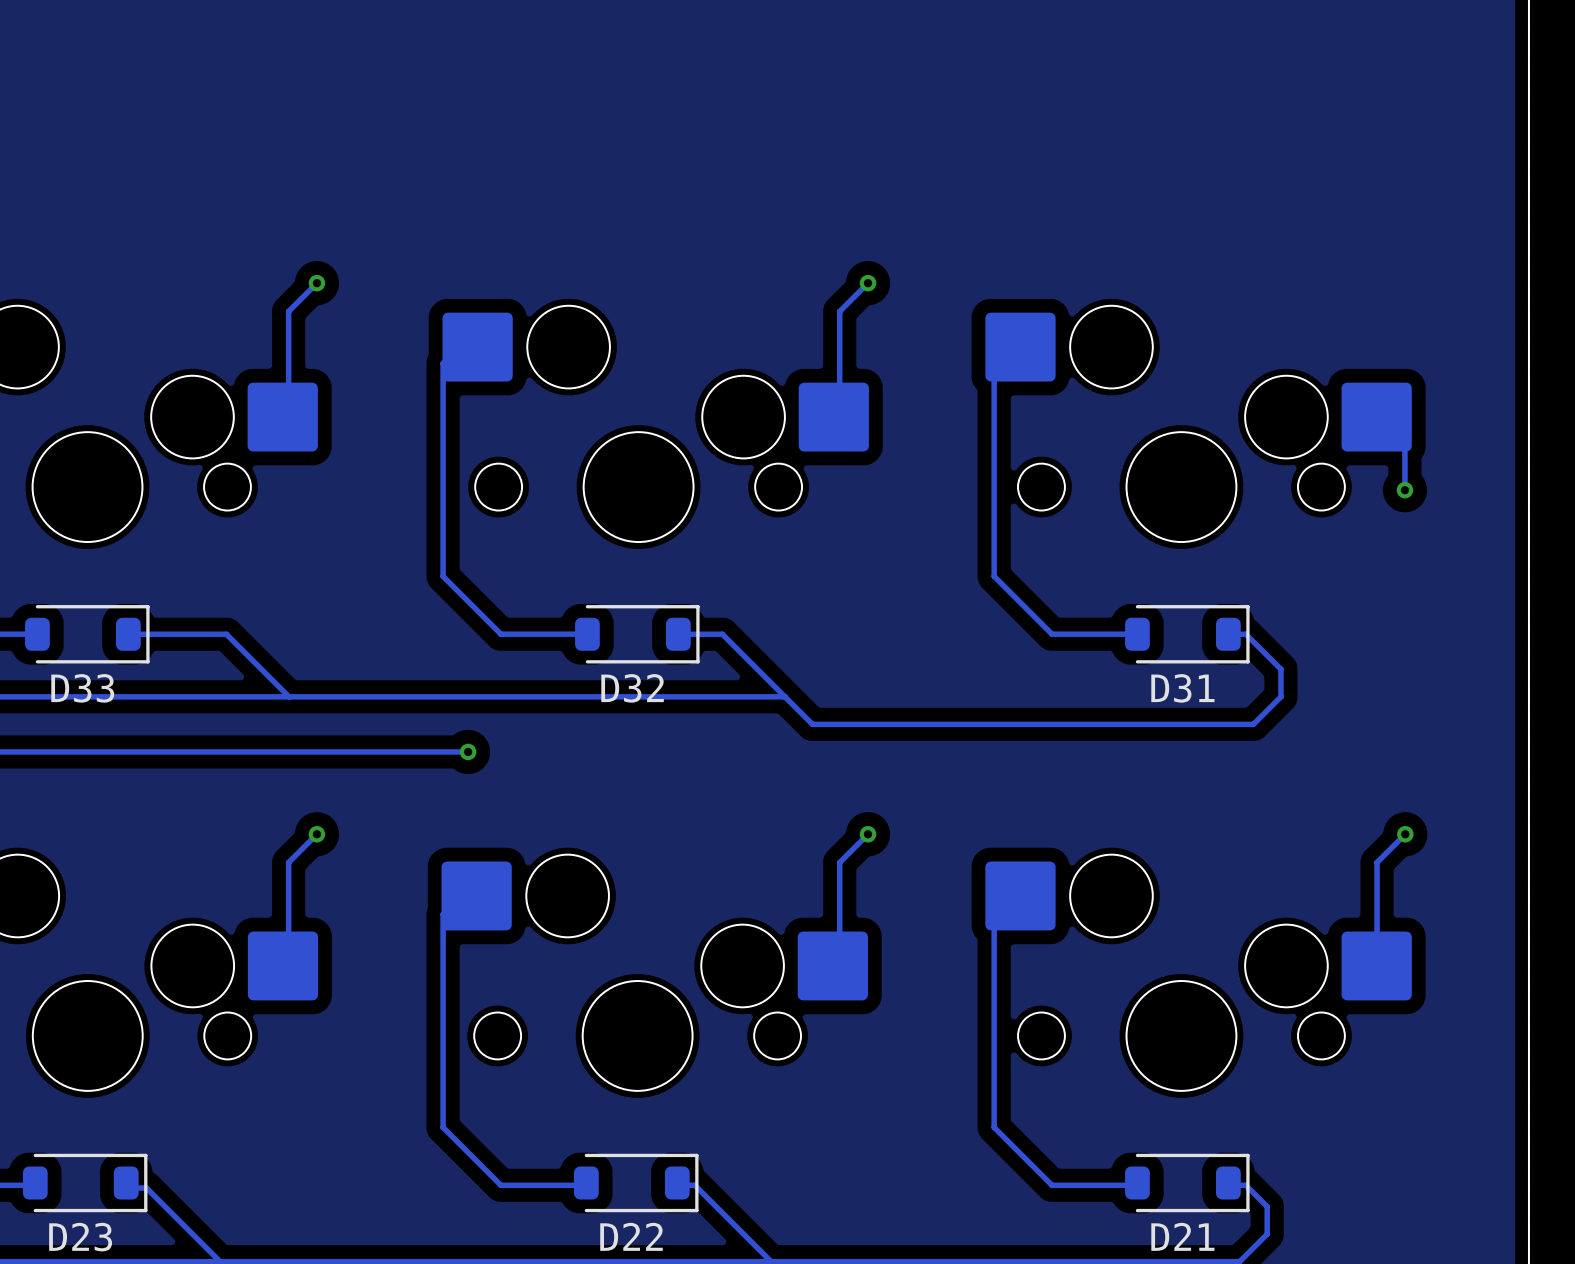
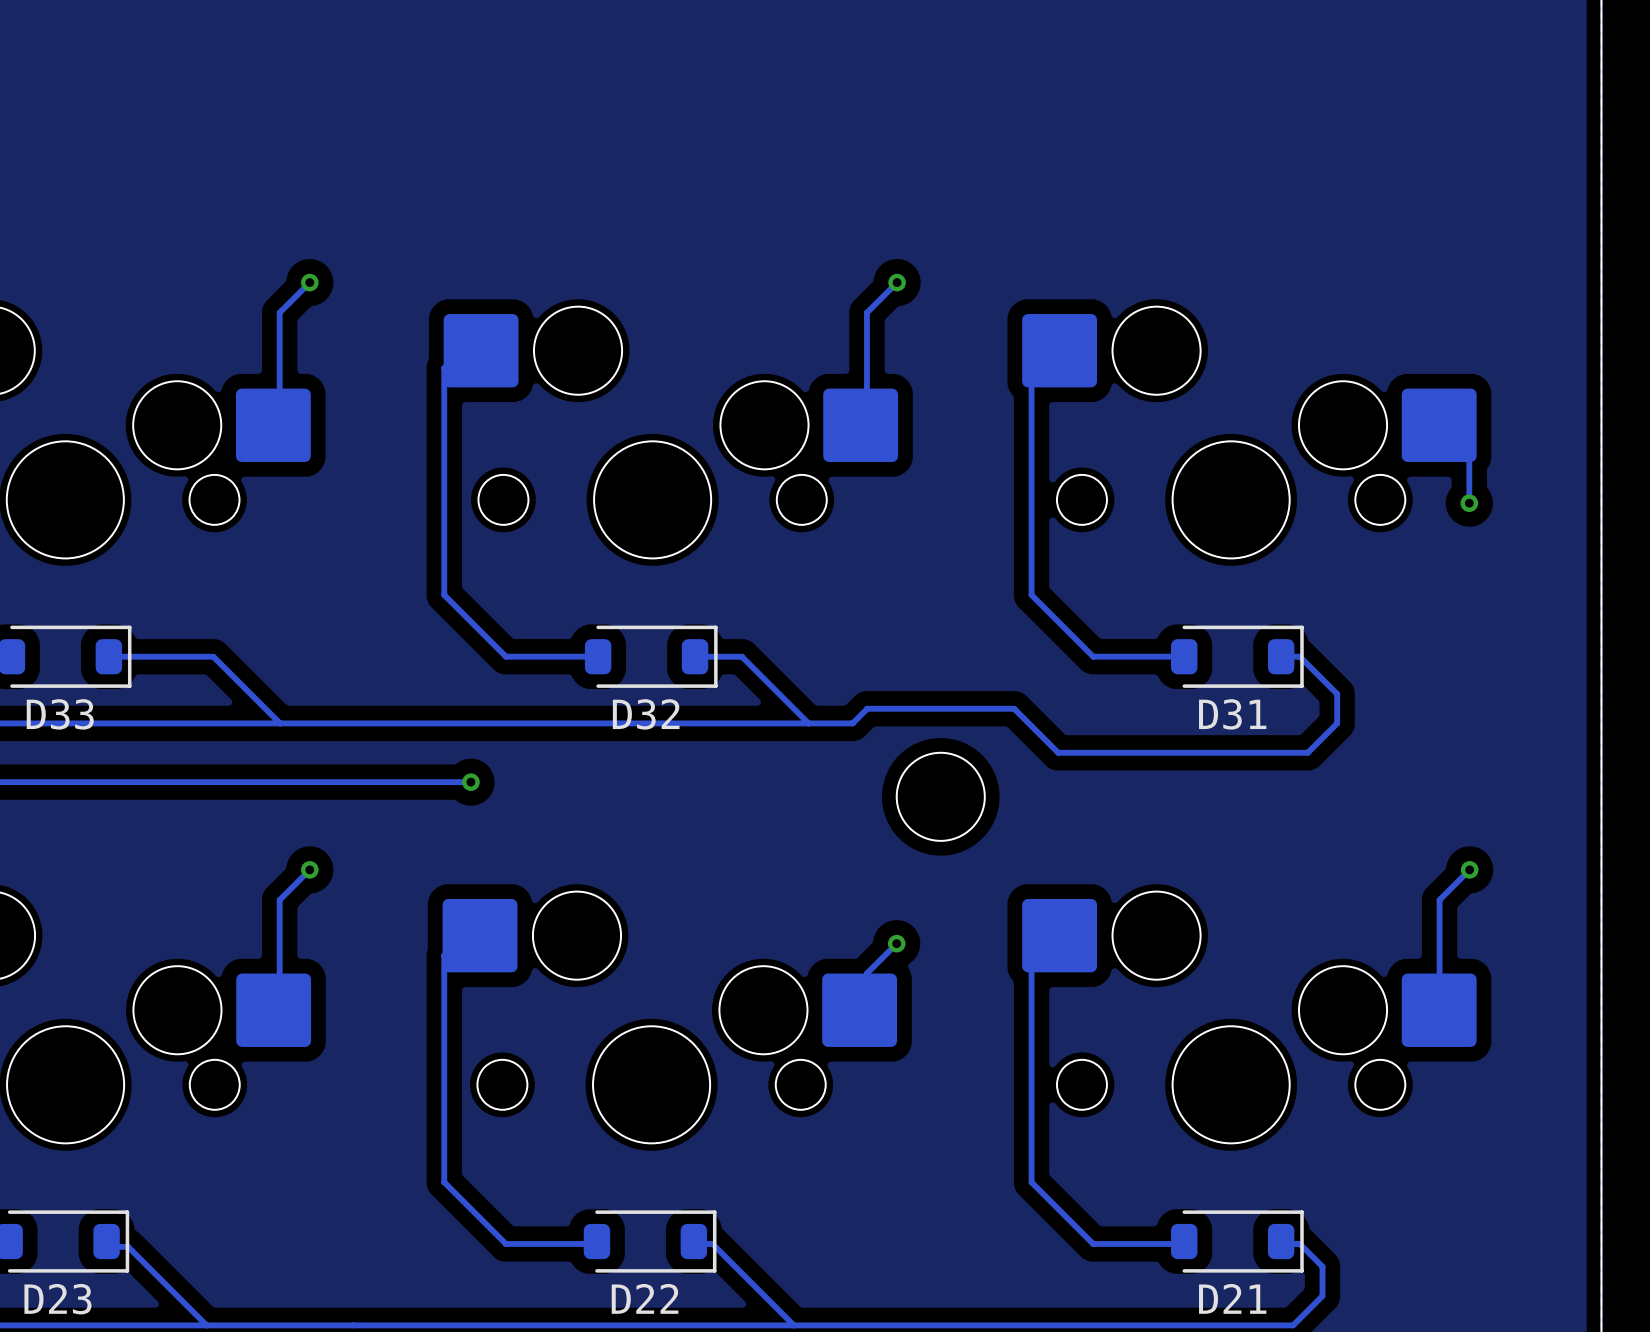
track: (784, 696) (812, 724) (1019, 724) -> (808, 723) (852, 723) (867, 708) (1014, 708) (1058, 752)
round board edge: none -> [895, 752, 986, 842]
track: (868, 834) (839, 862) (839, 931) -> (896, 943) (866, 973)
via position: (868, 834) -> (896, 943)

